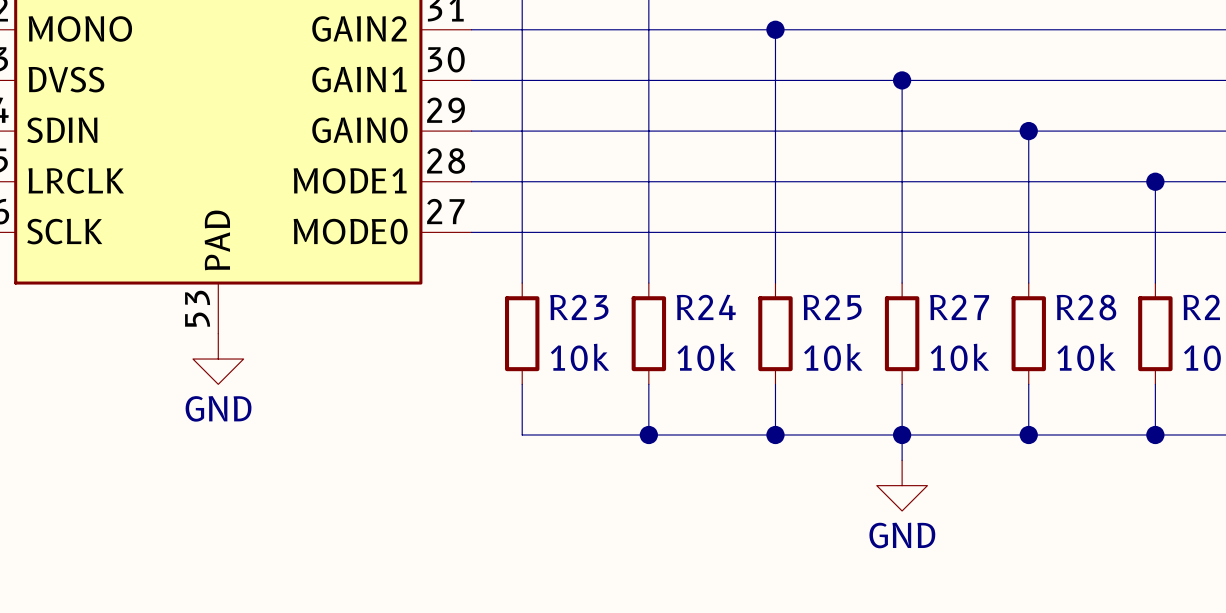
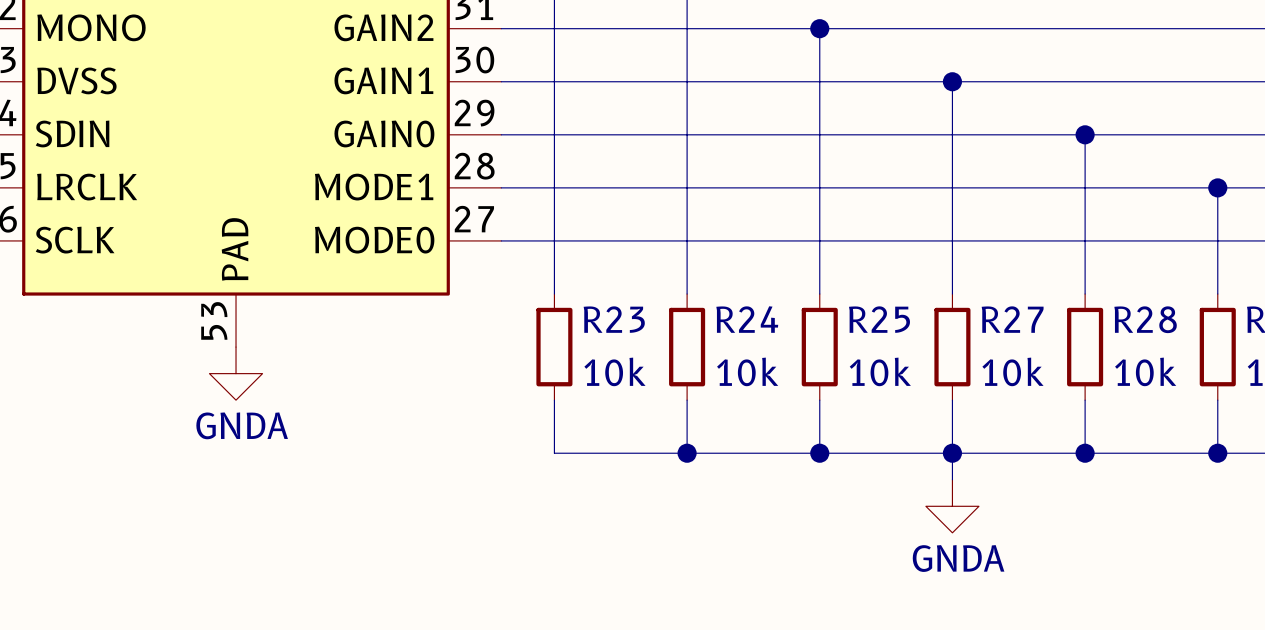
power symbol: GND (218, 359) -> GNDA (236, 373)
power symbol: GND (902, 485) -> GNDA (952, 506)

